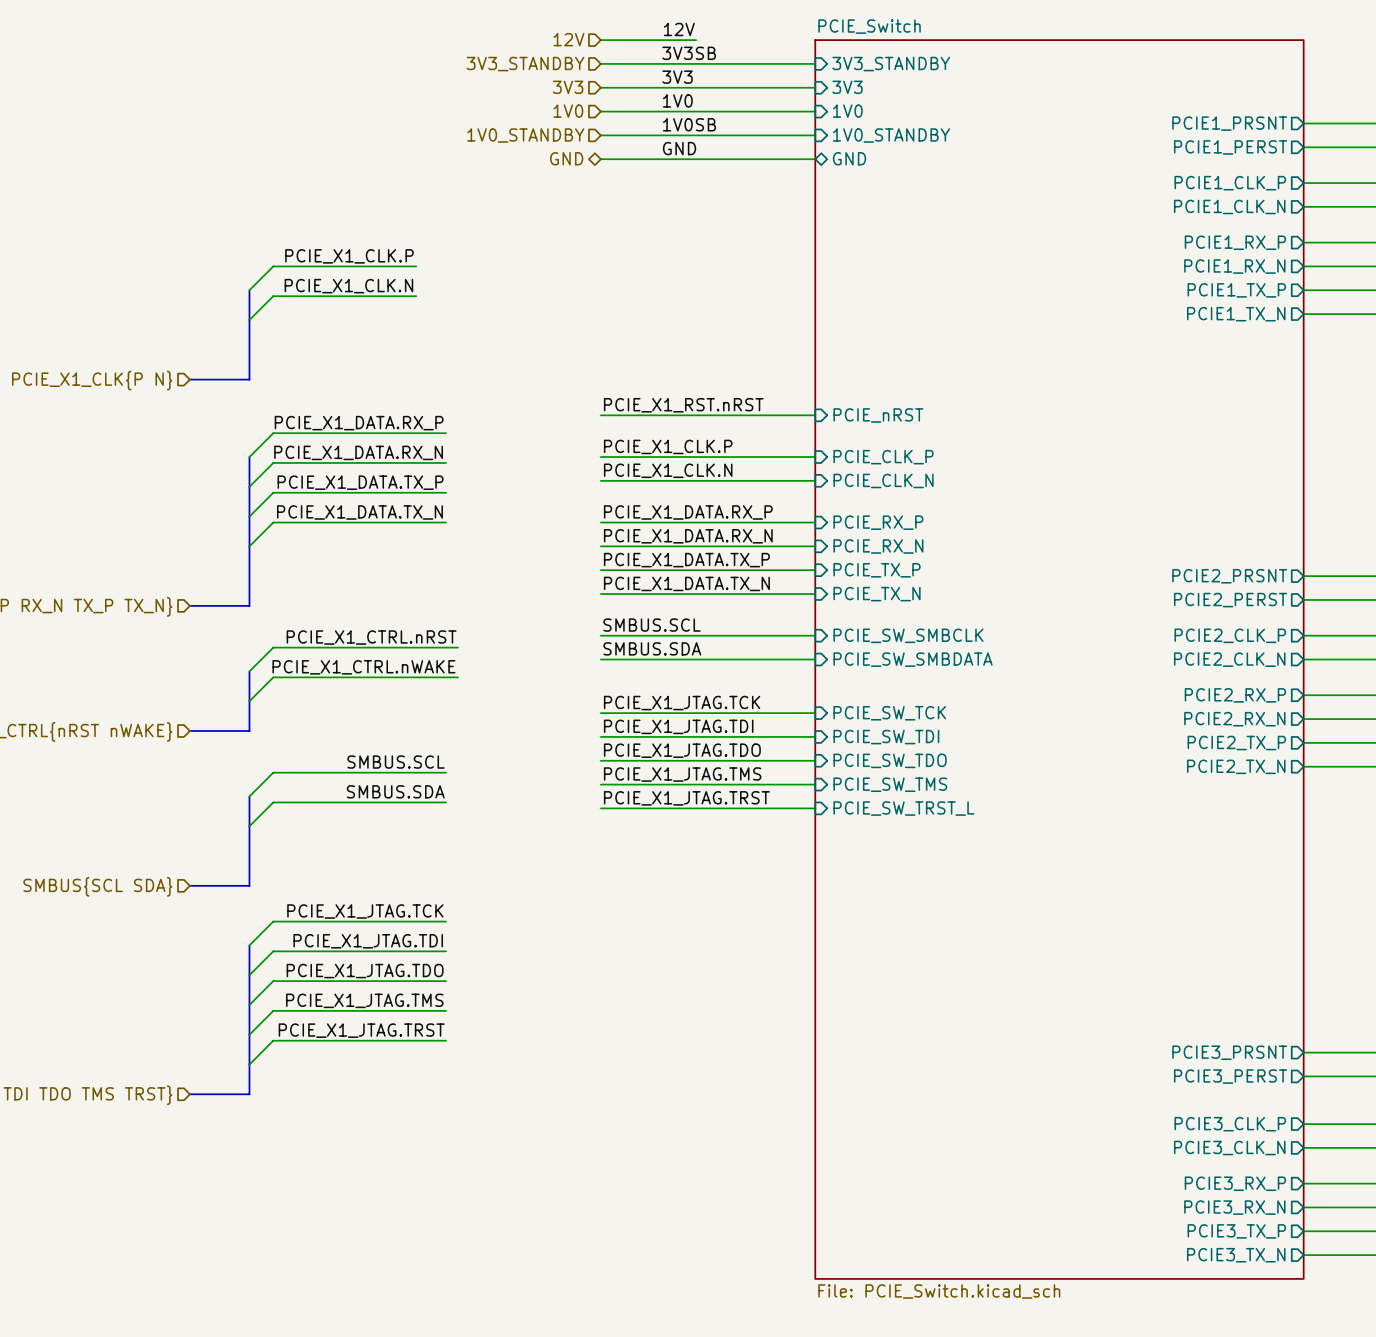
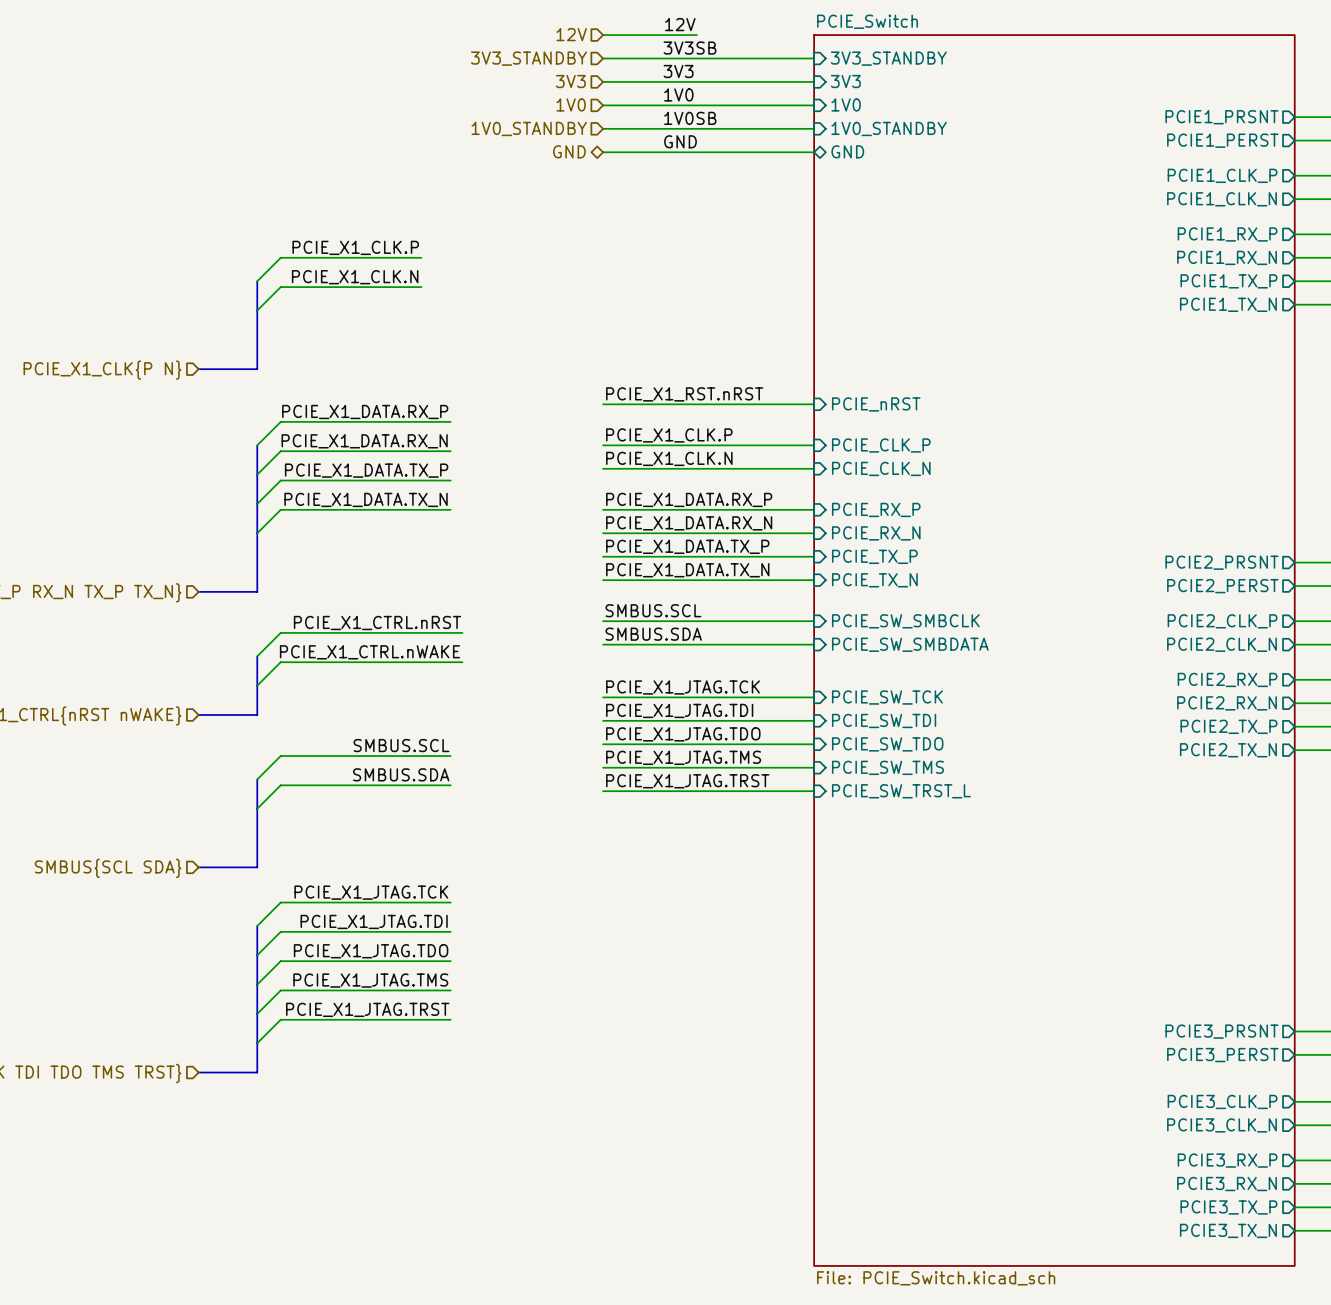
sheet PCIE_Switch shape: [814, 39, 1305, 1280] -> [813, 34, 1296, 1267]

